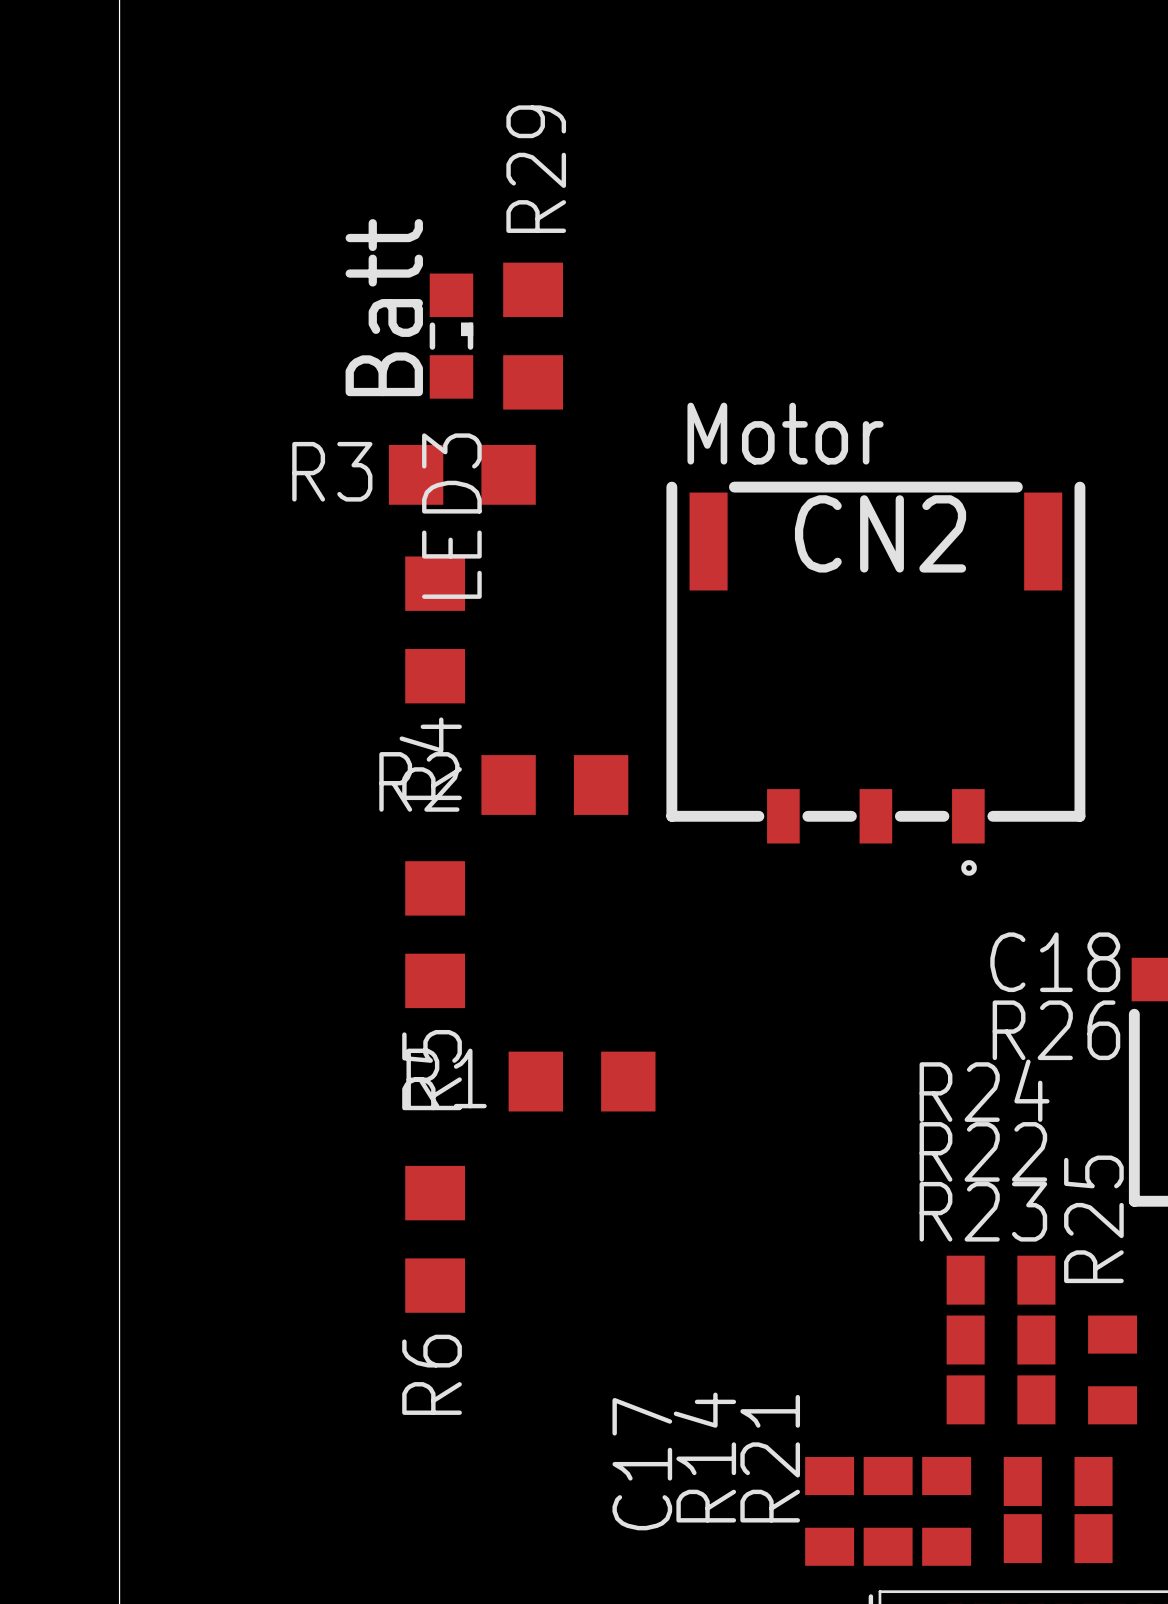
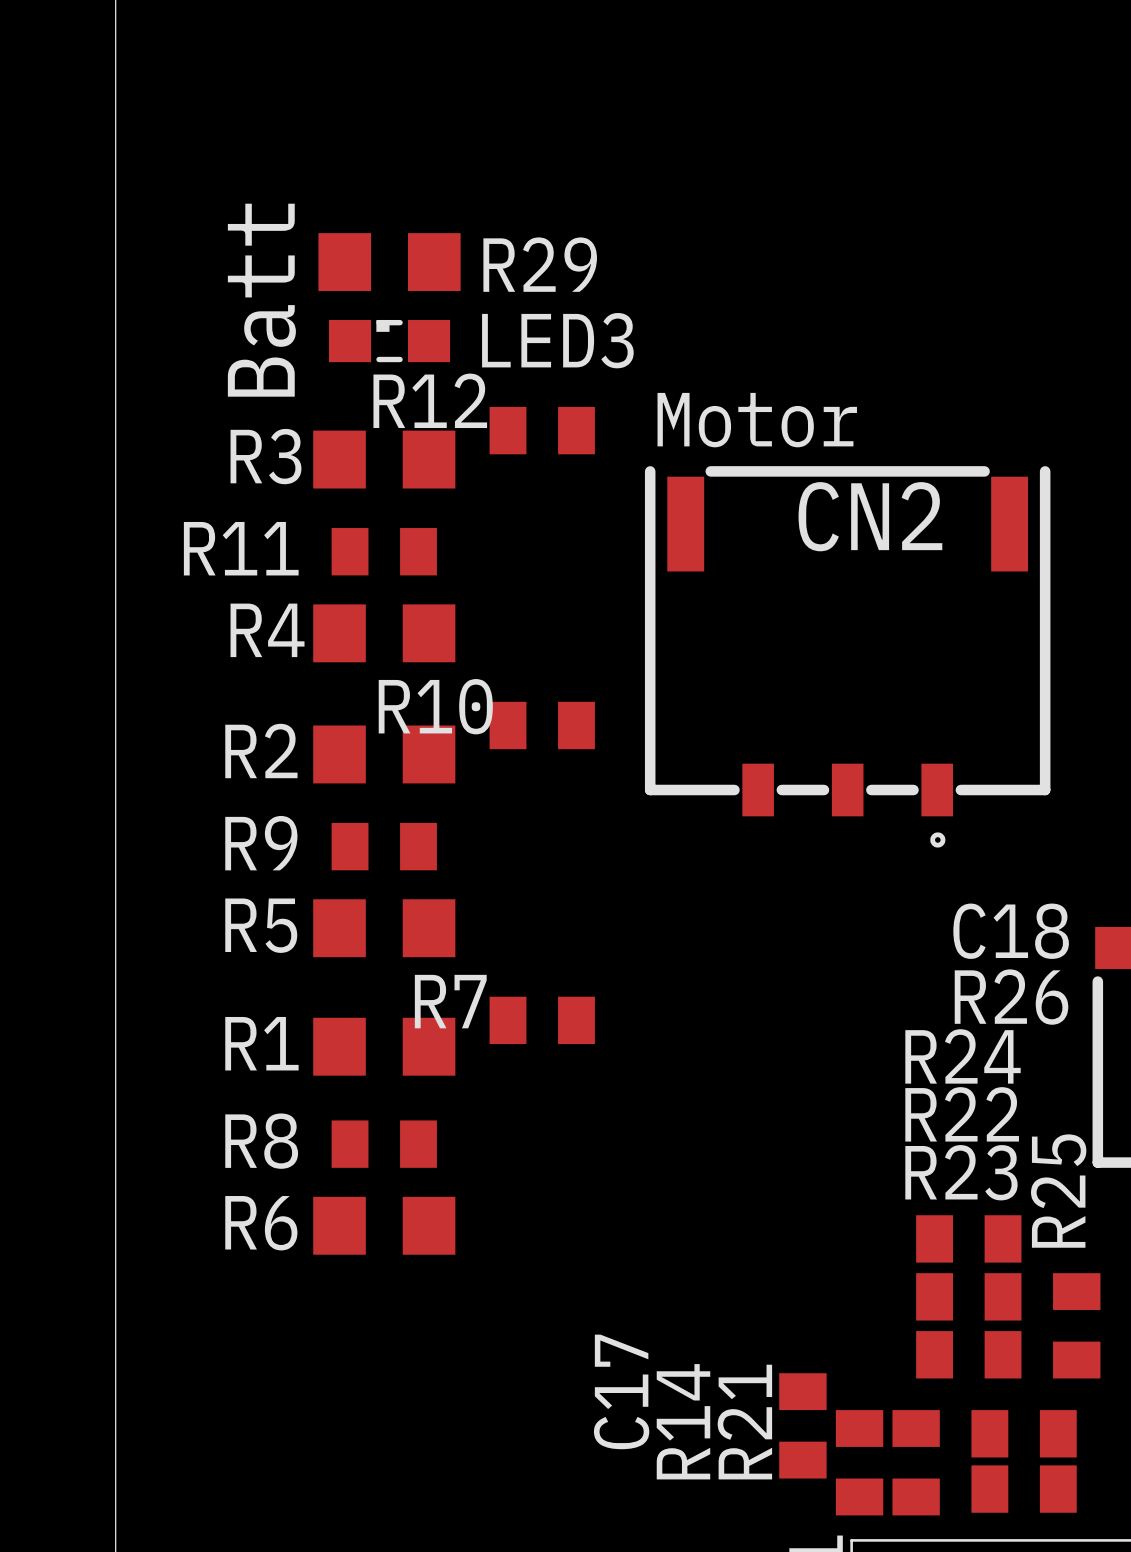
text position: Batt (384, 307) -> Batt (261, 300)
LED3 rotation: 0° (451, 336) -> 90° counterclockwise (389, 341)
R29 rotation: 0° (533, 336) -> 90° clockwise (389, 262)
R29 position: (533, 336) -> (389, 262)
R12: none -> (542, 430)
R3 position: (462, 474) -> (384, 459)
R11: none -> (384, 551)
R4 rotation: 0° (435, 629) -> 90° clockwise (384, 633)
R10: none -> (542, 725)
R2 position: (554, 785) -> (384, 754)
R9: none -> (384, 846)
R5 rotation: 0° (435, 934) -> 90° clockwise (384, 928)
R7: none -> (542, 1020)
R1 position: (582, 1081) -> (384, 1046)
R8: none -> (384, 1144)
R6 rotation: 0° (435, 1239) -> 90° clockwise (384, 1225)
C17 position: (829, 1511) -> (802, 1425)

